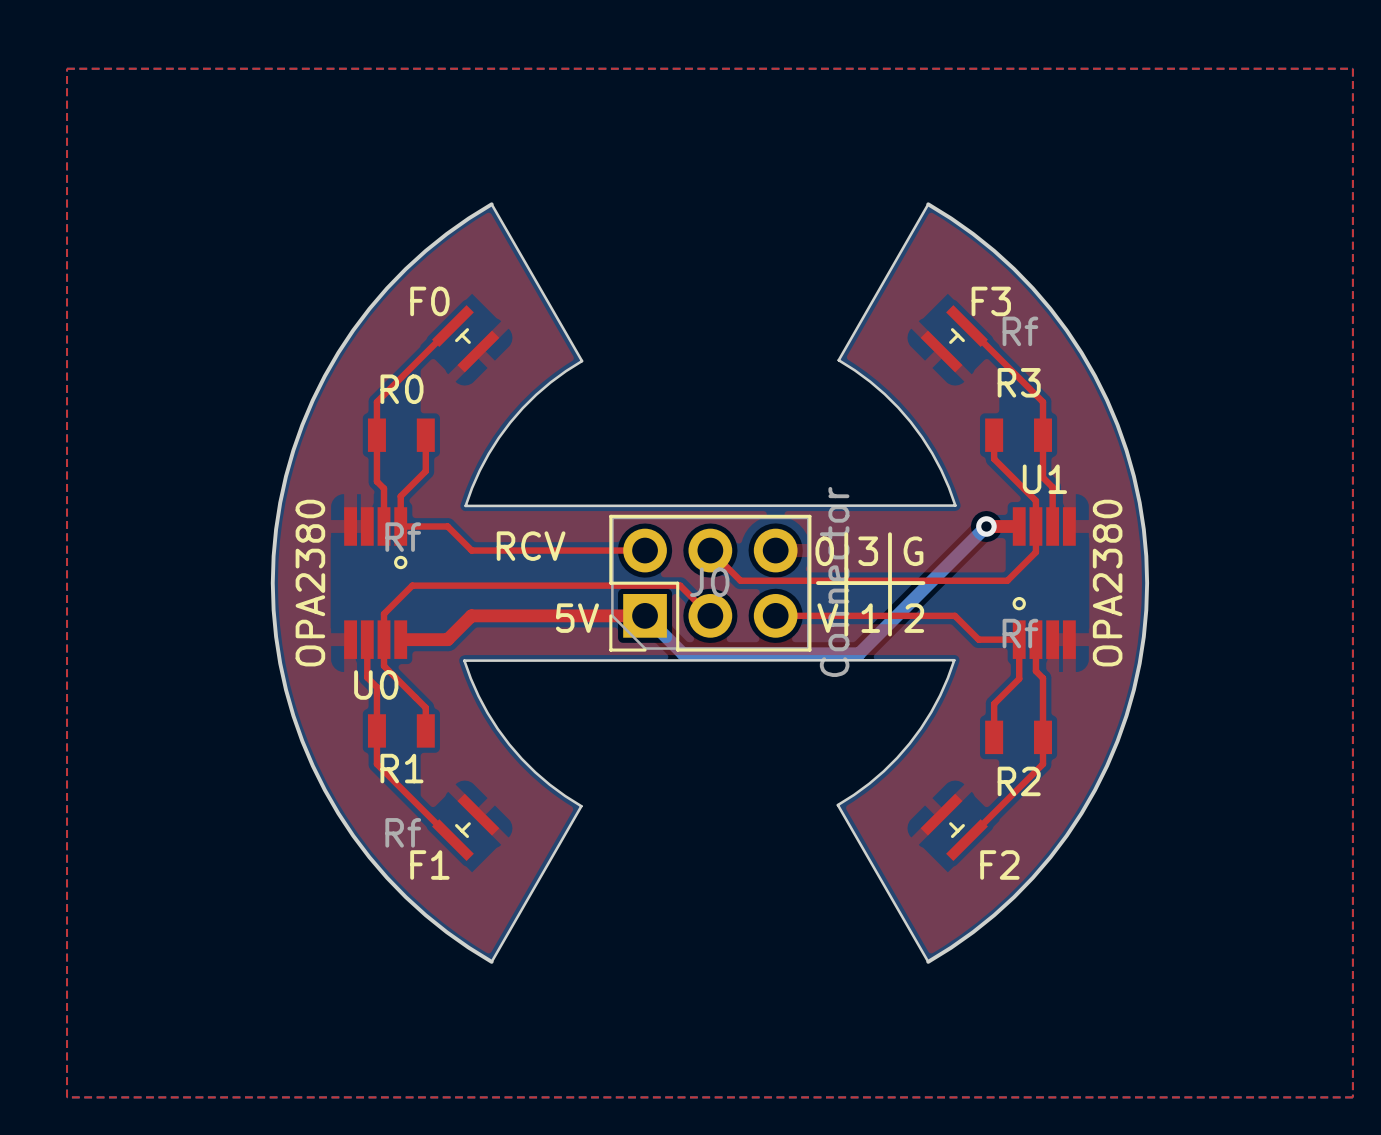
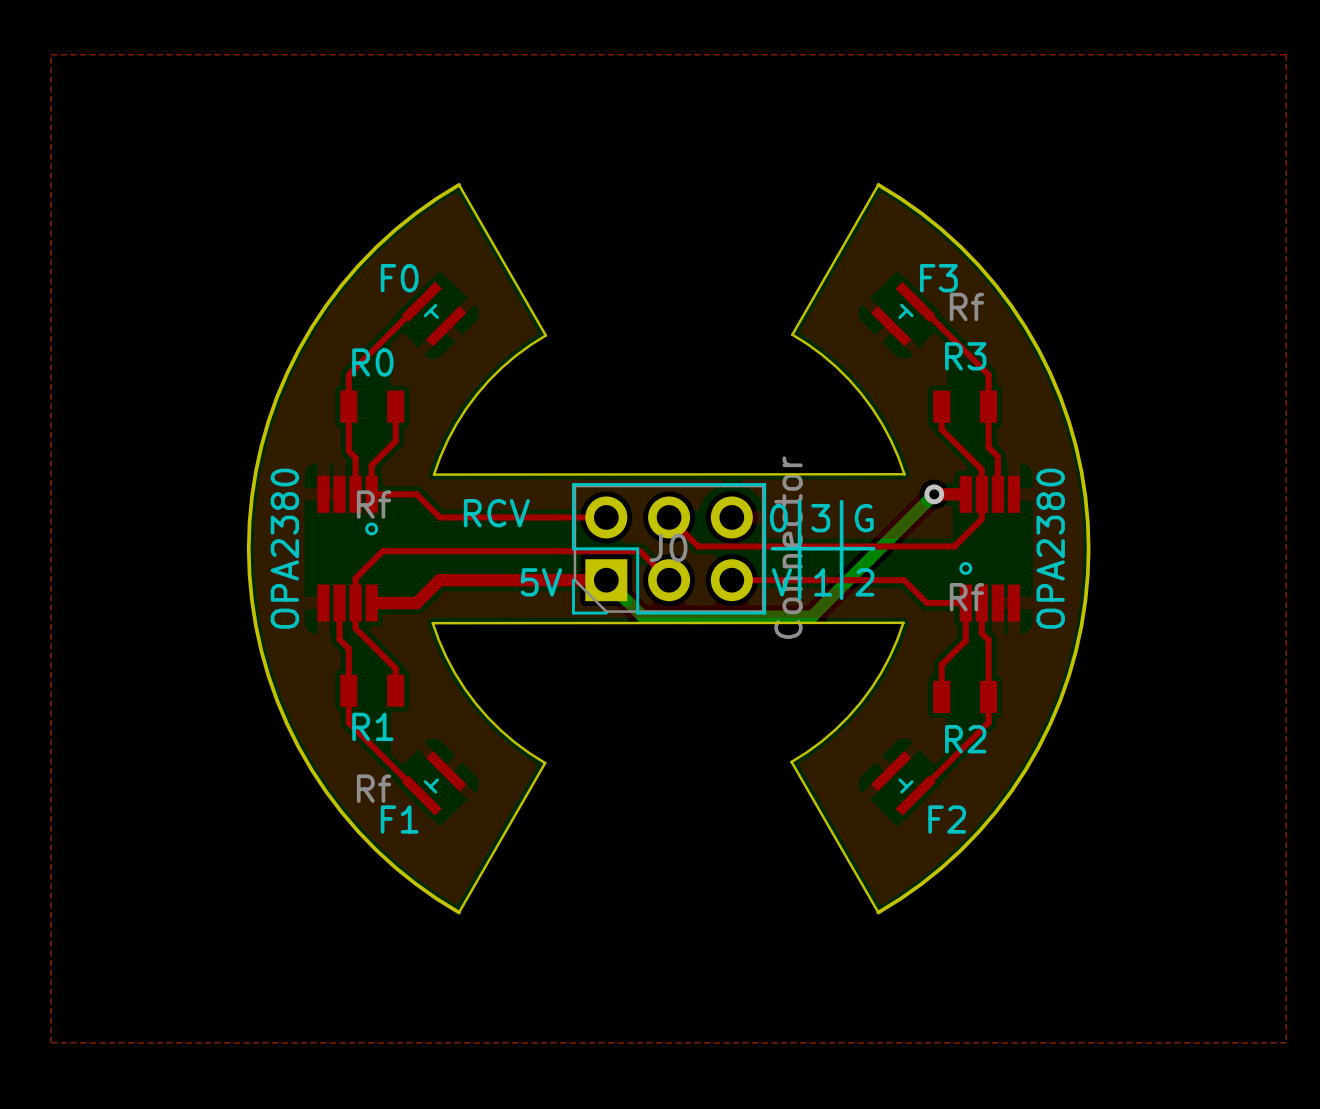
U1 name: U1 (1044, 479) -> none
U0 name: U0 (376, 684) -> none

